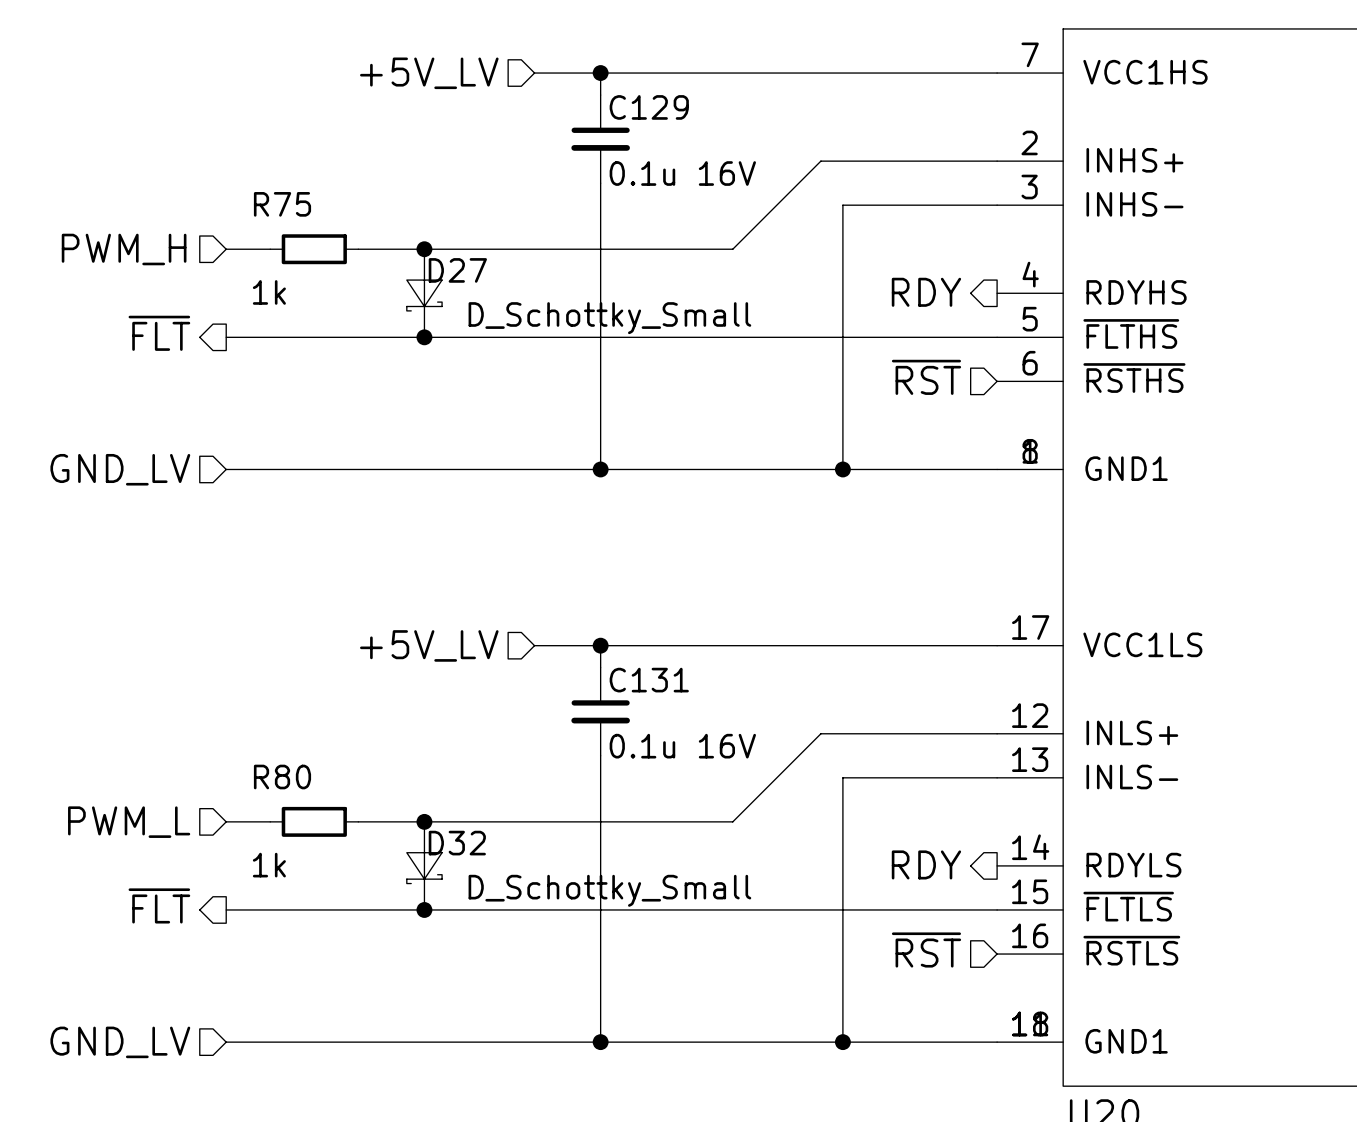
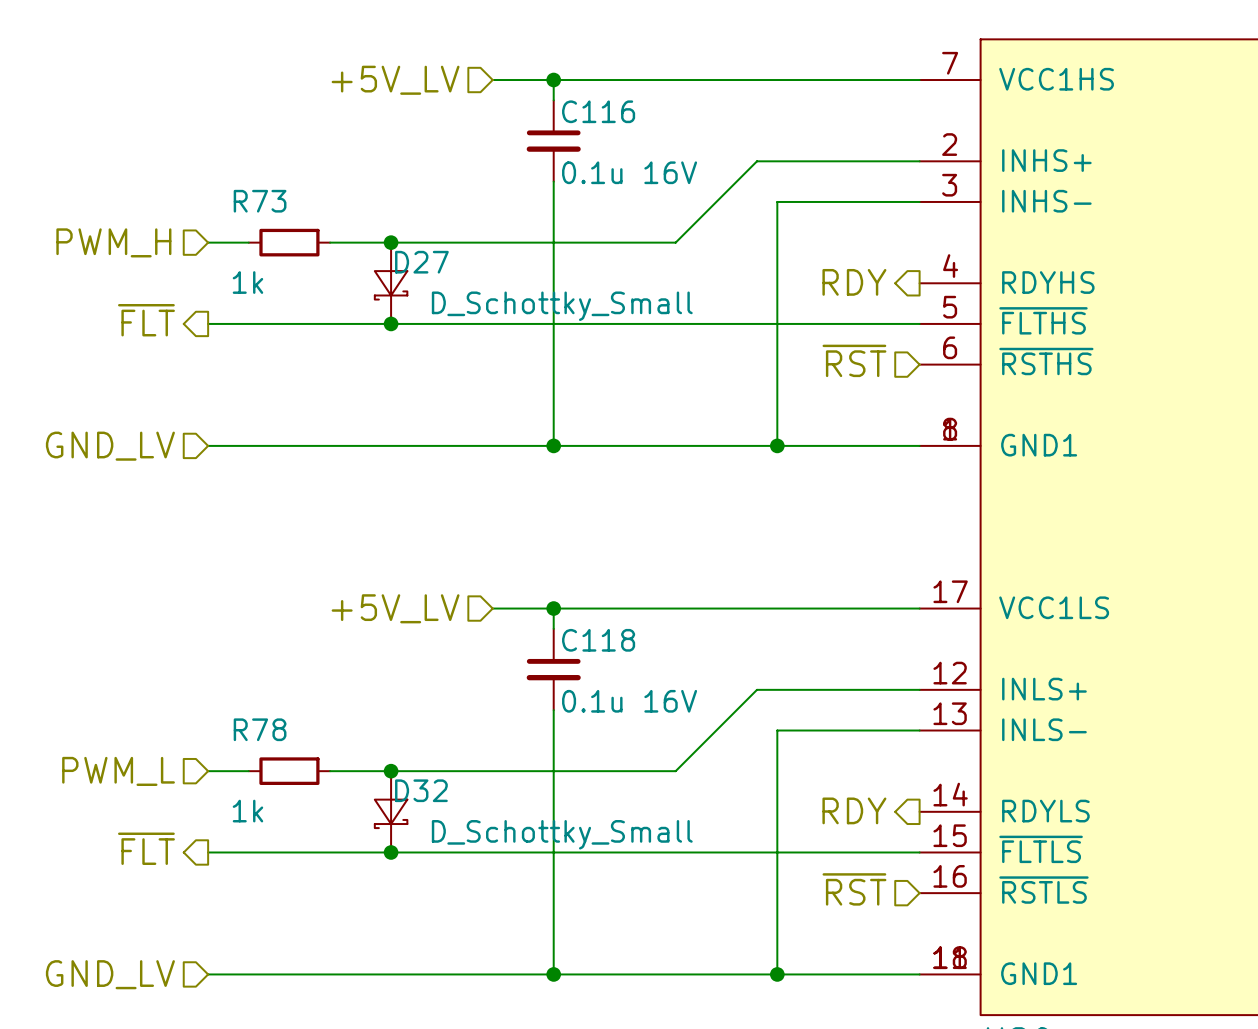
C129 name: C129 (649, 107) -> C116 (598, 111)
R75 name: R75 (282, 204) -> R73 (260, 201)
C131 name: C131 (649, 680) -> C118 (598, 640)
R80 name: R80 (282, 777) -> R78 (260, 729)

